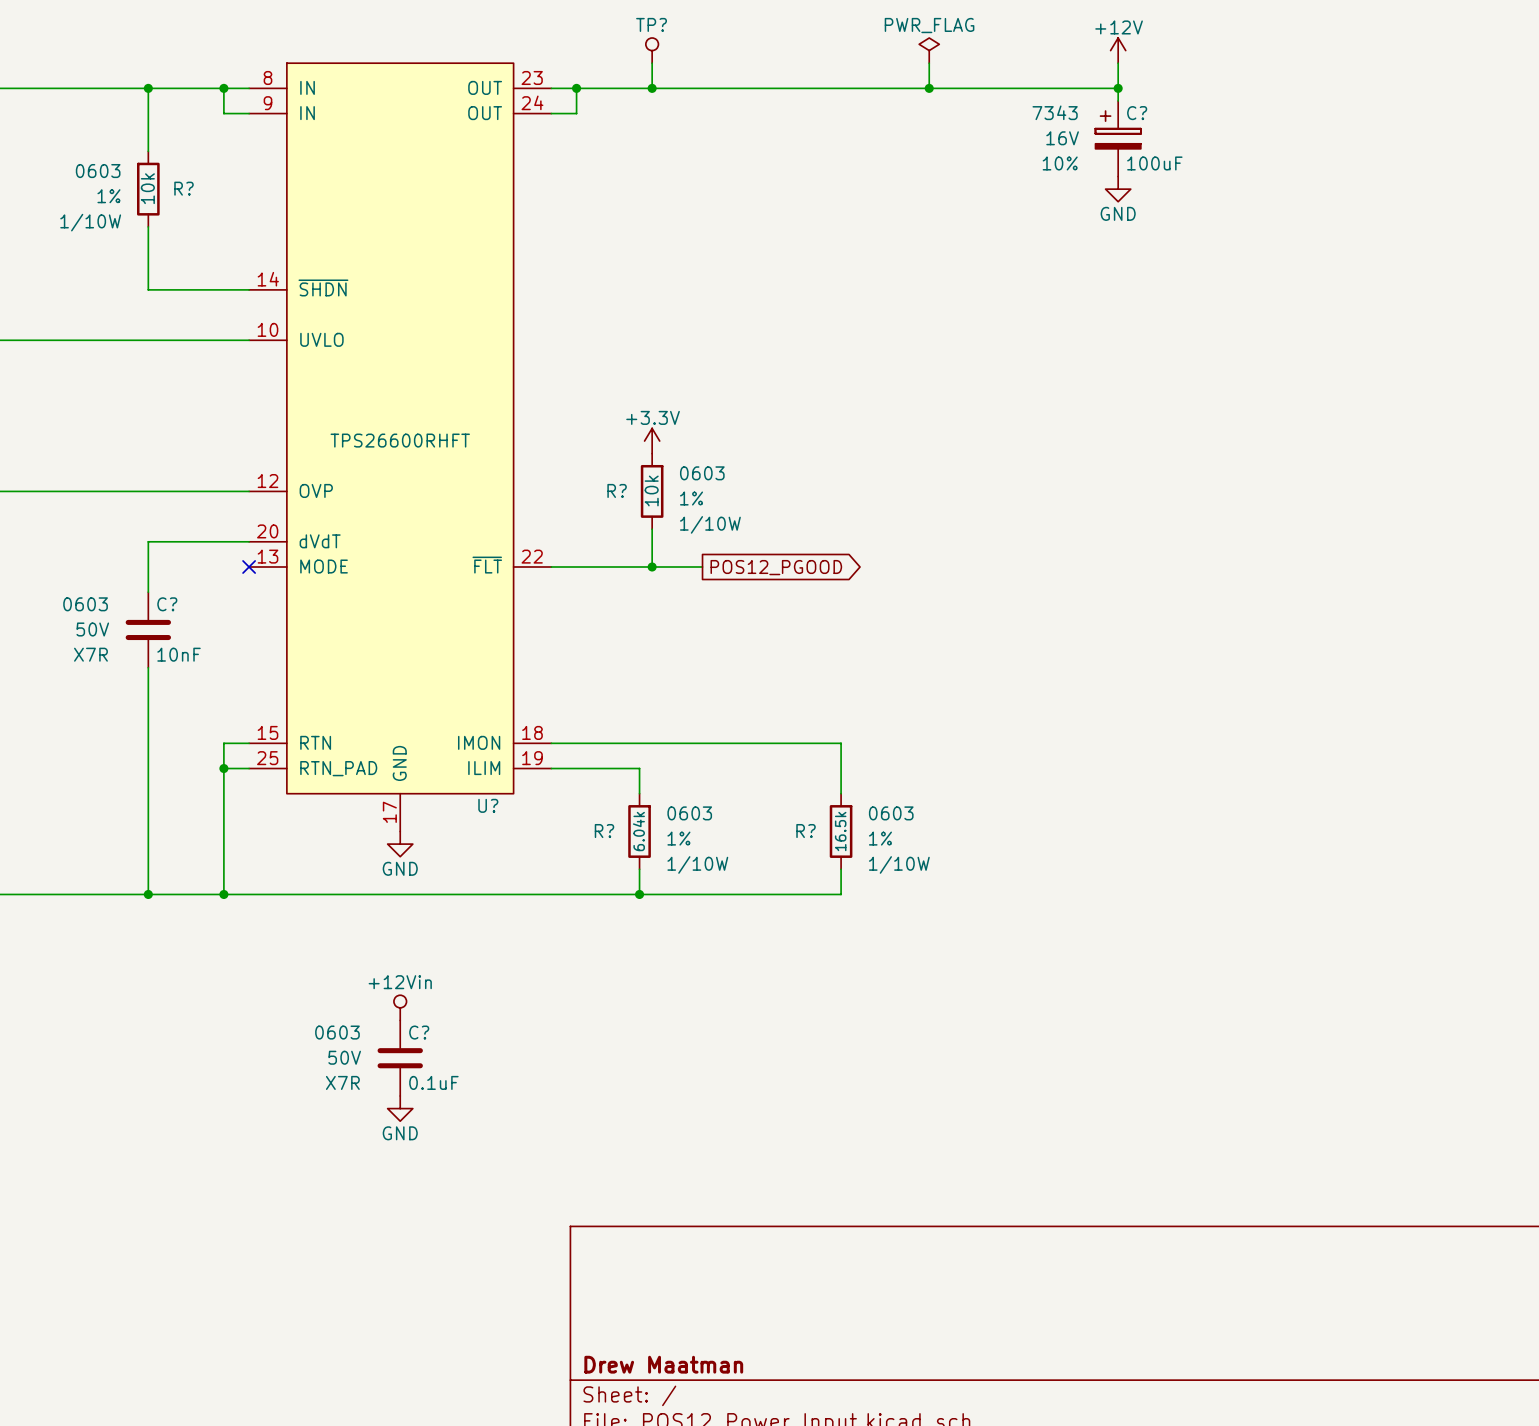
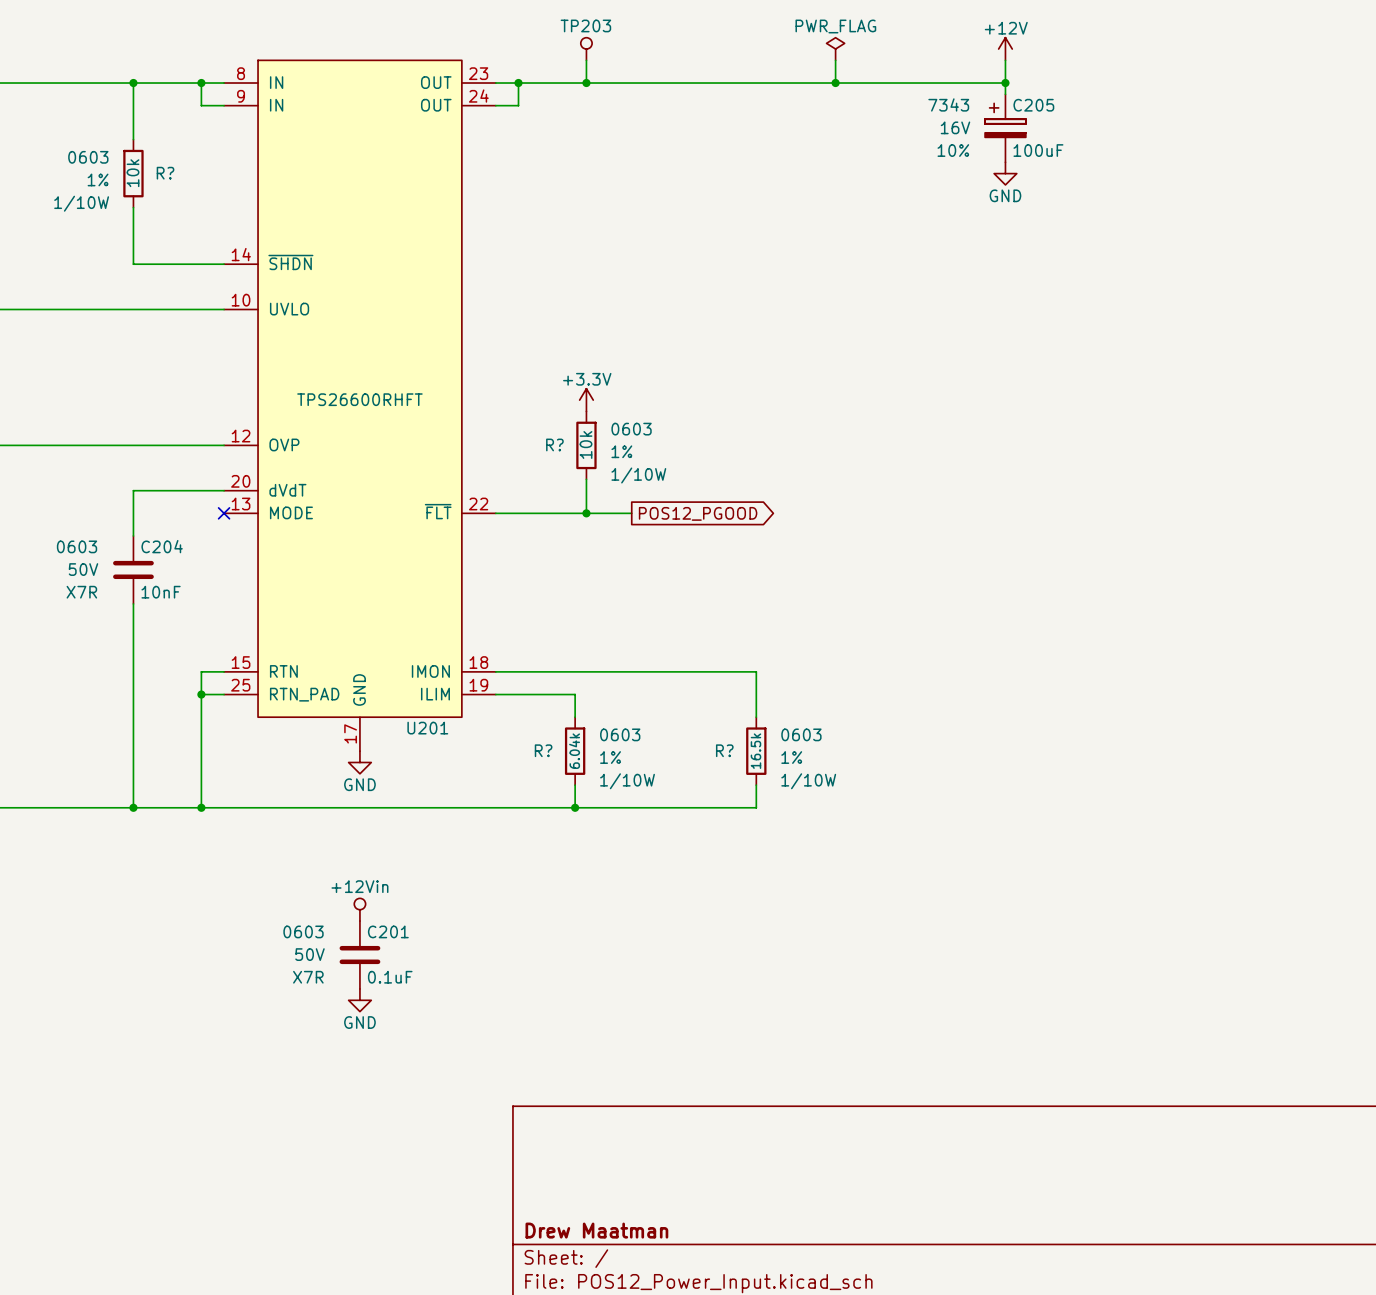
TP? name: TP? (651, 24) -> TP203 (585, 25)
C? name: C? (1137, 113) -> C205 (1033, 105)
C? name: C? (167, 604) -> C204 (162, 546)
U? name: U? (488, 805) -> U201 (427, 728)
C? name: C? (419, 1032) -> C201 (388, 931)

